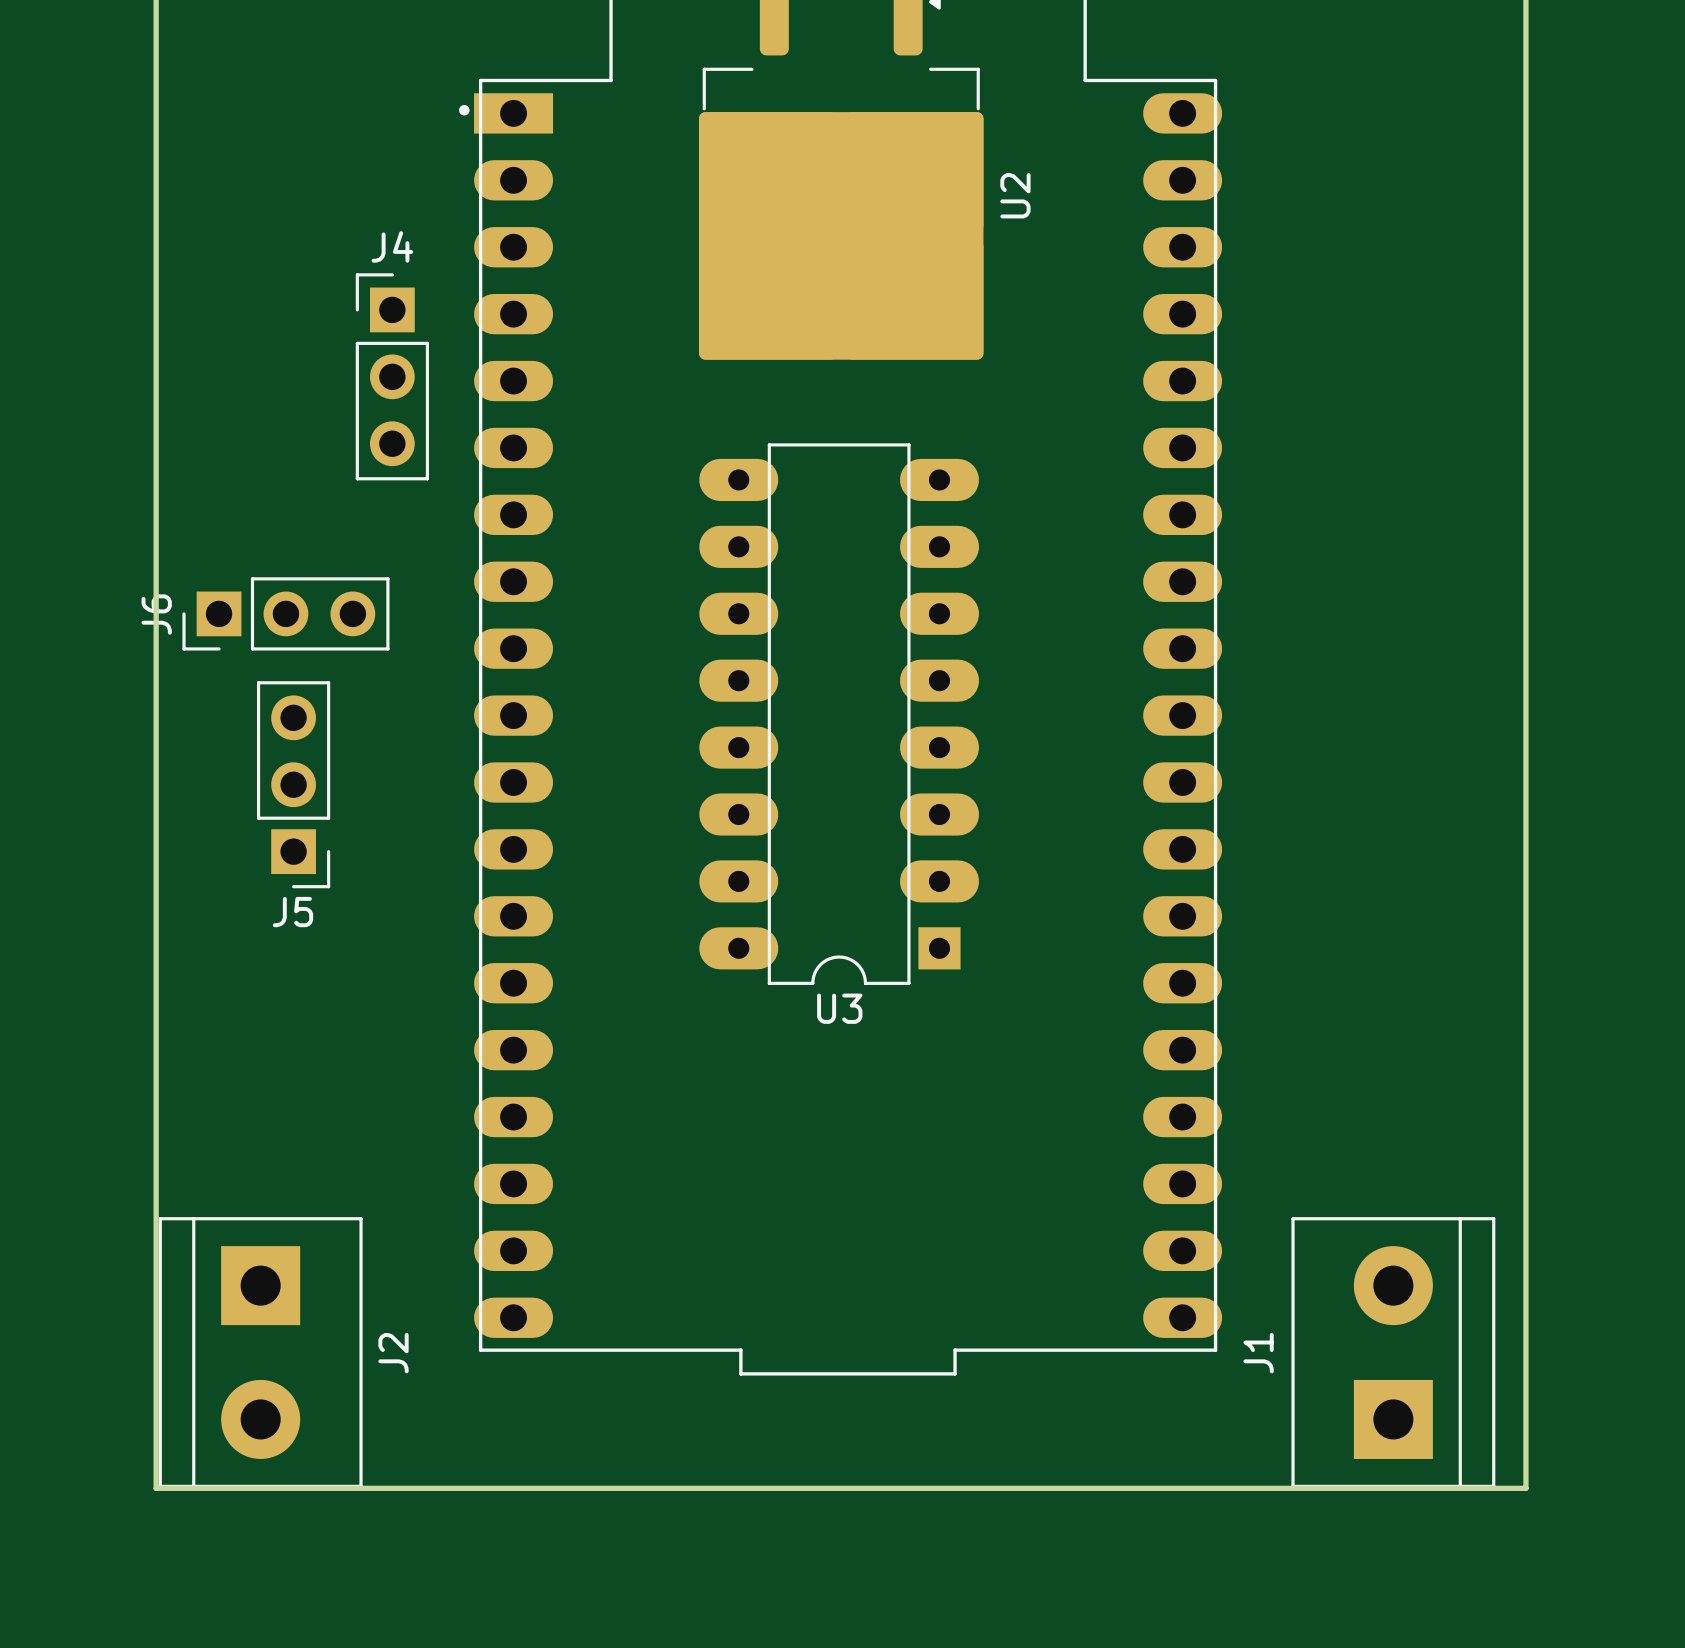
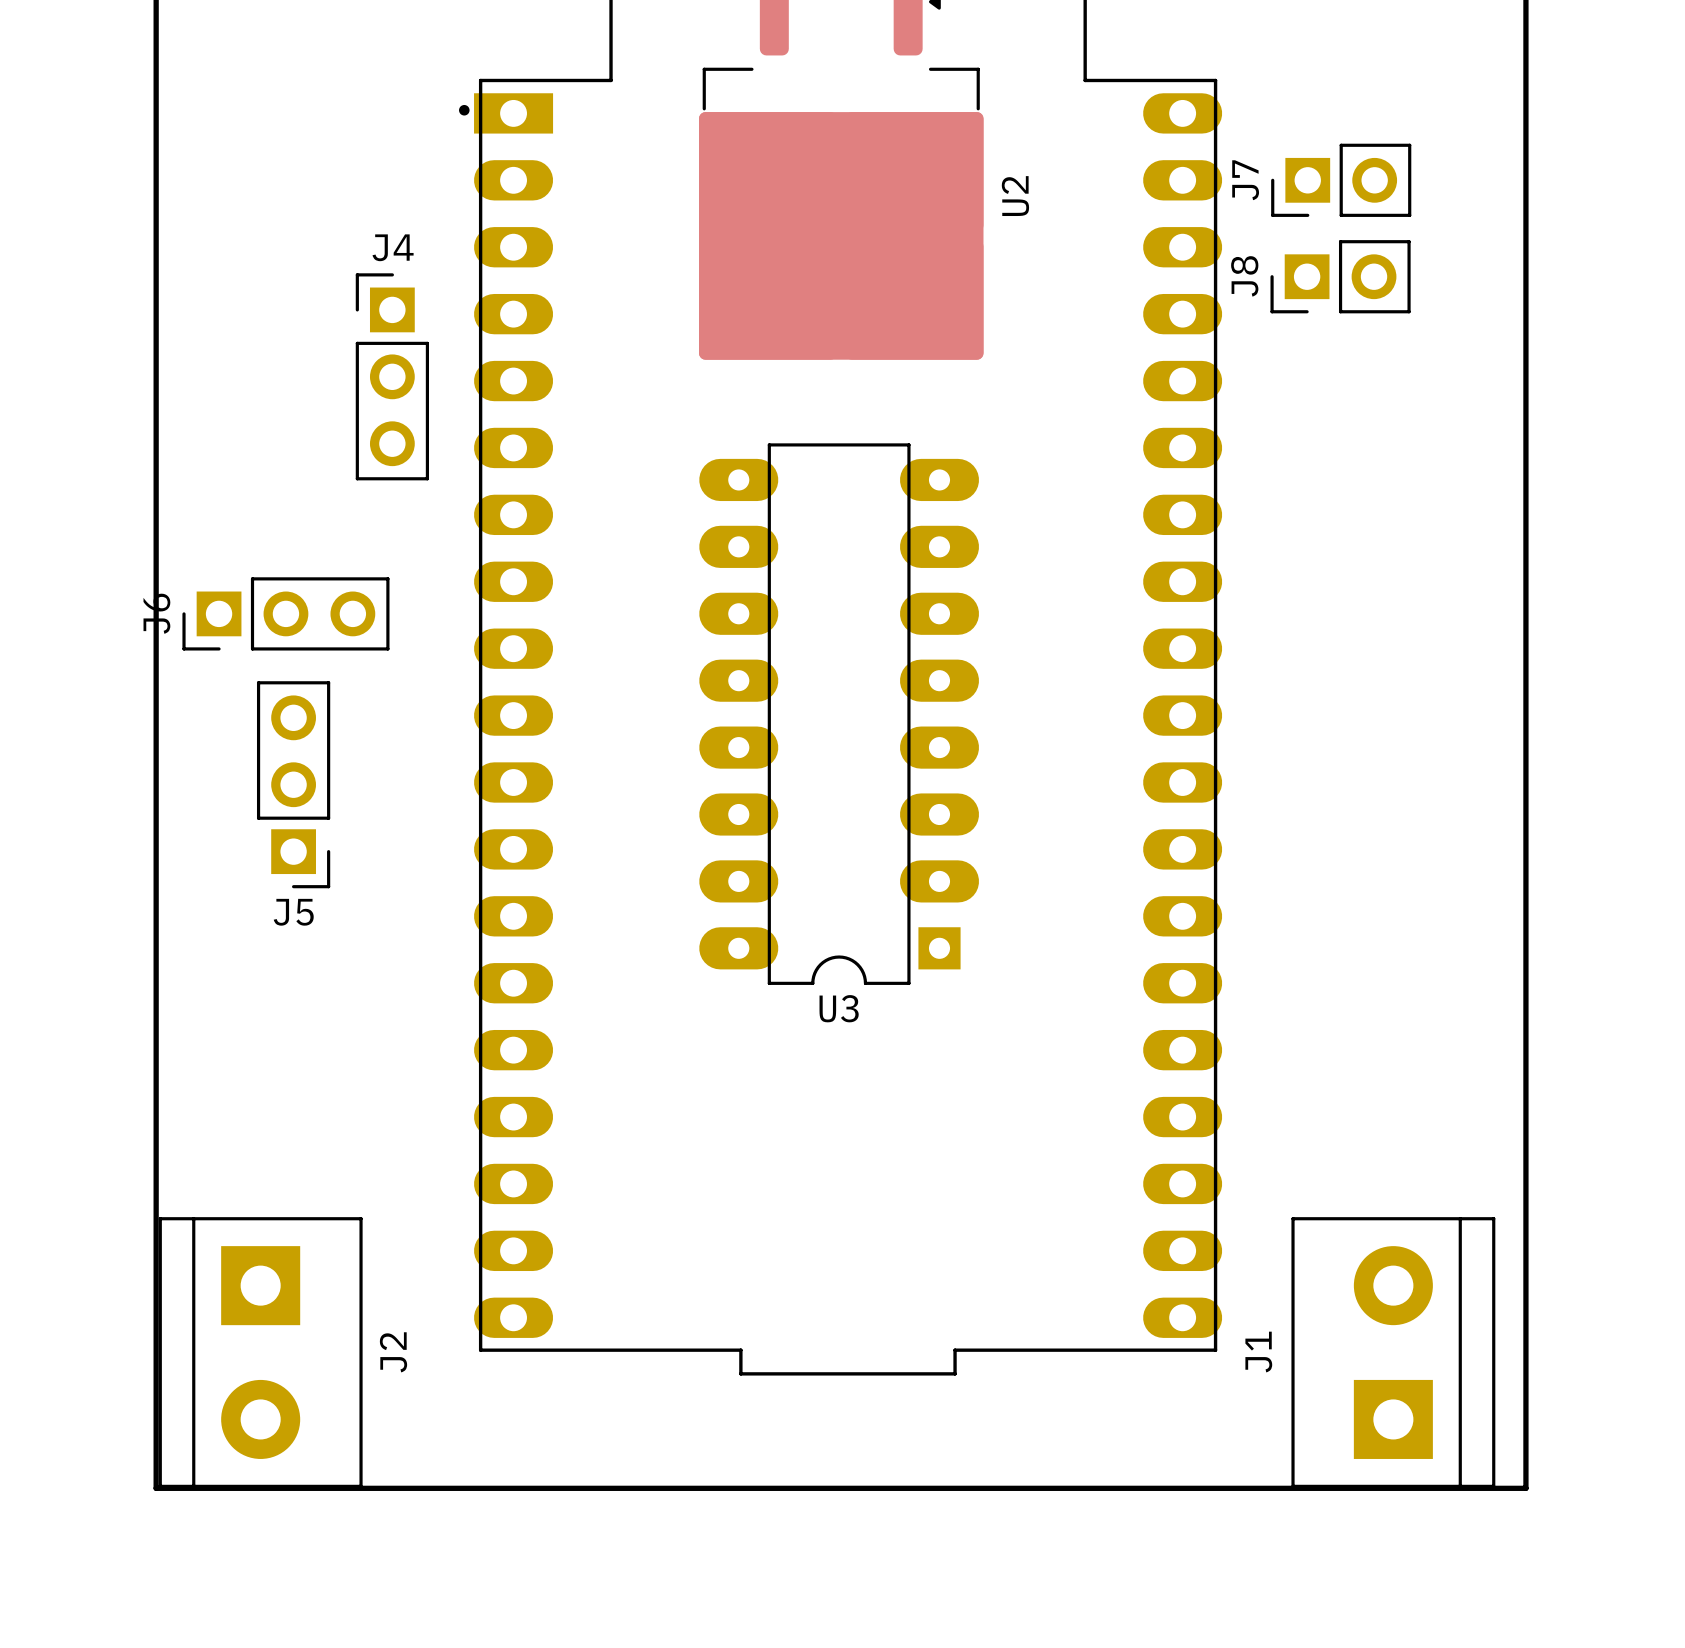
J7: none -> (1341, 180)
J8: none -> (1340, 276)

